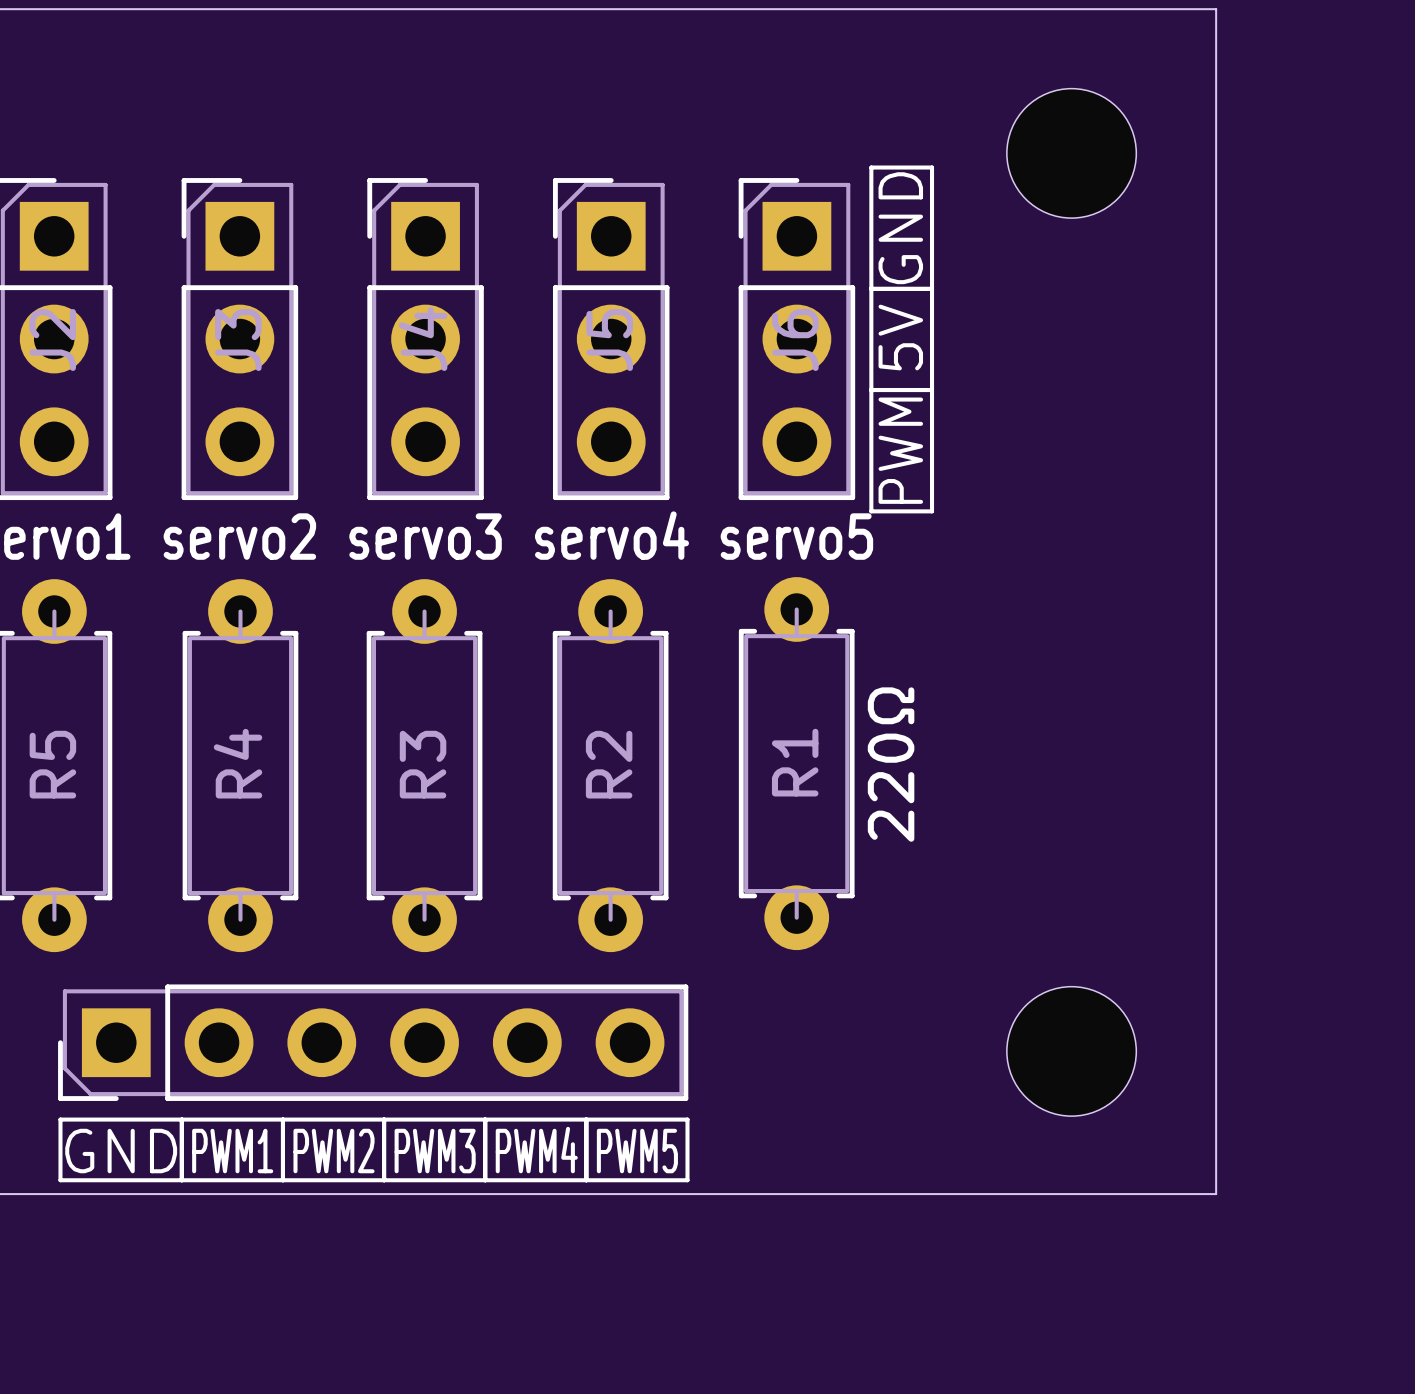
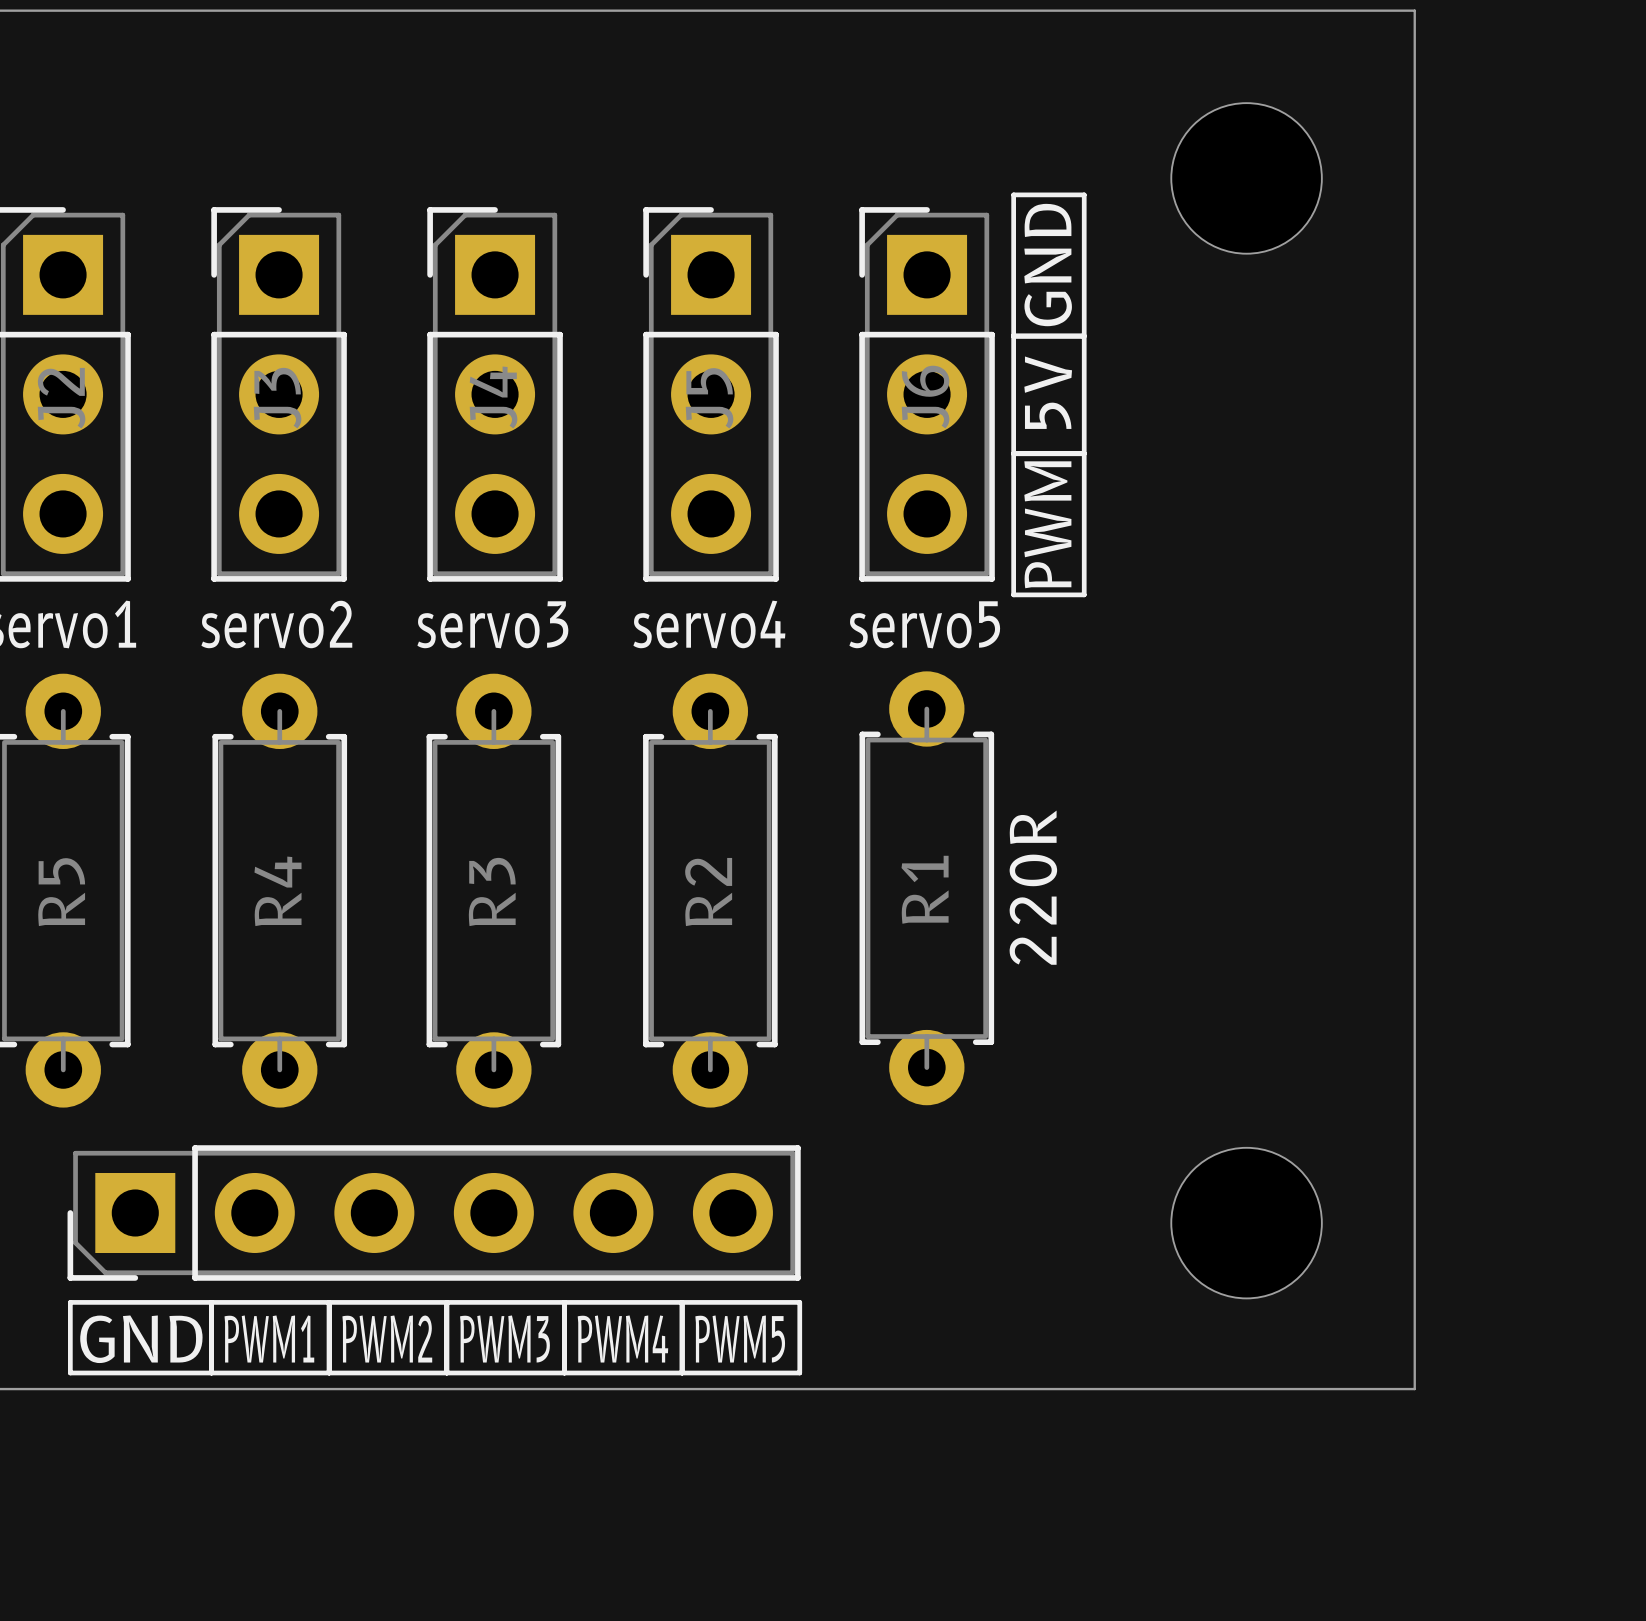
R1 value: 220Ω (891, 764) -> none
text: none -> 220R (1033, 887)

